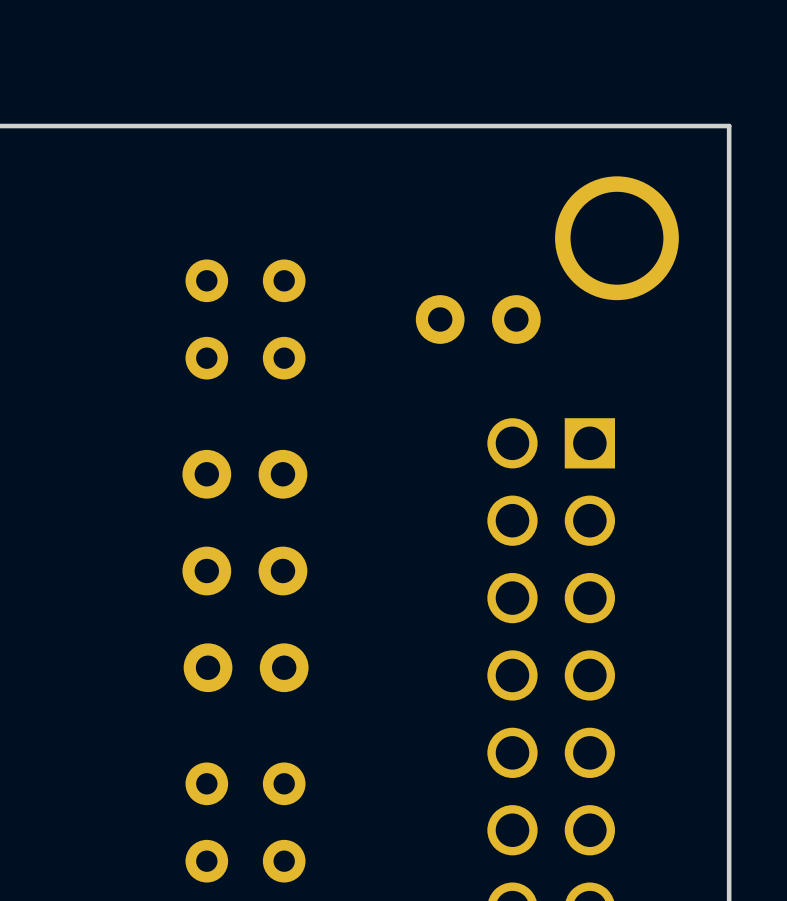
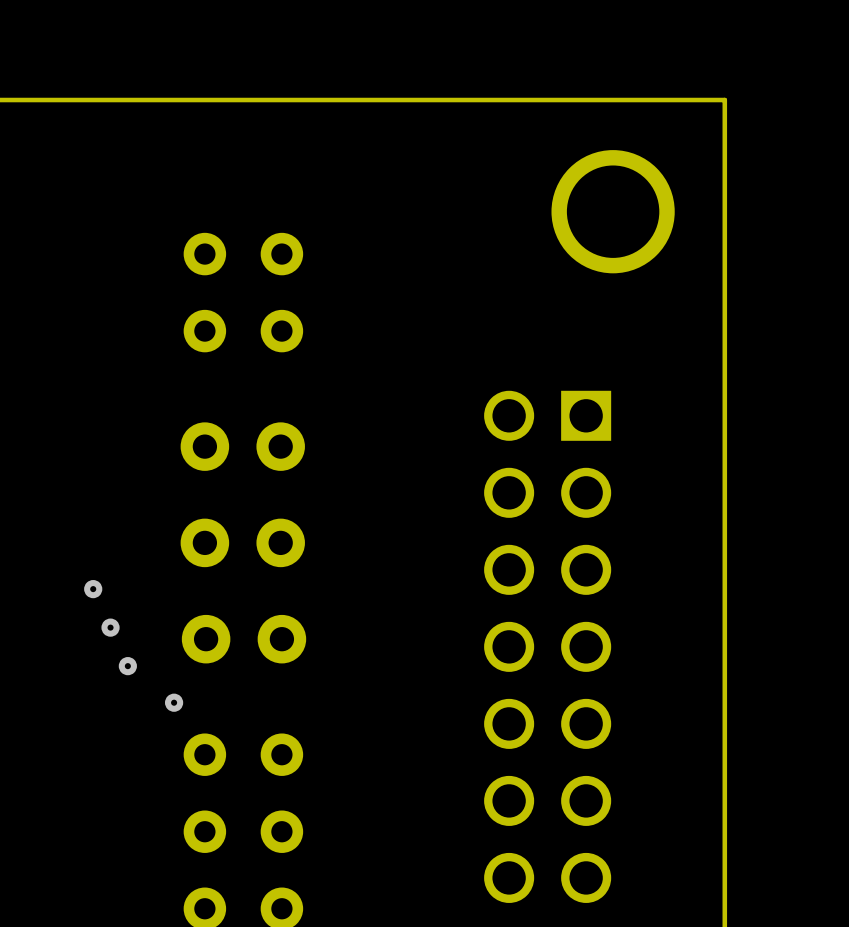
part: (478, 319) -> none
via: none -> (93, 589)
via: none -> (110, 627)
via: none -> (127, 666)
via: none -> (174, 702)

